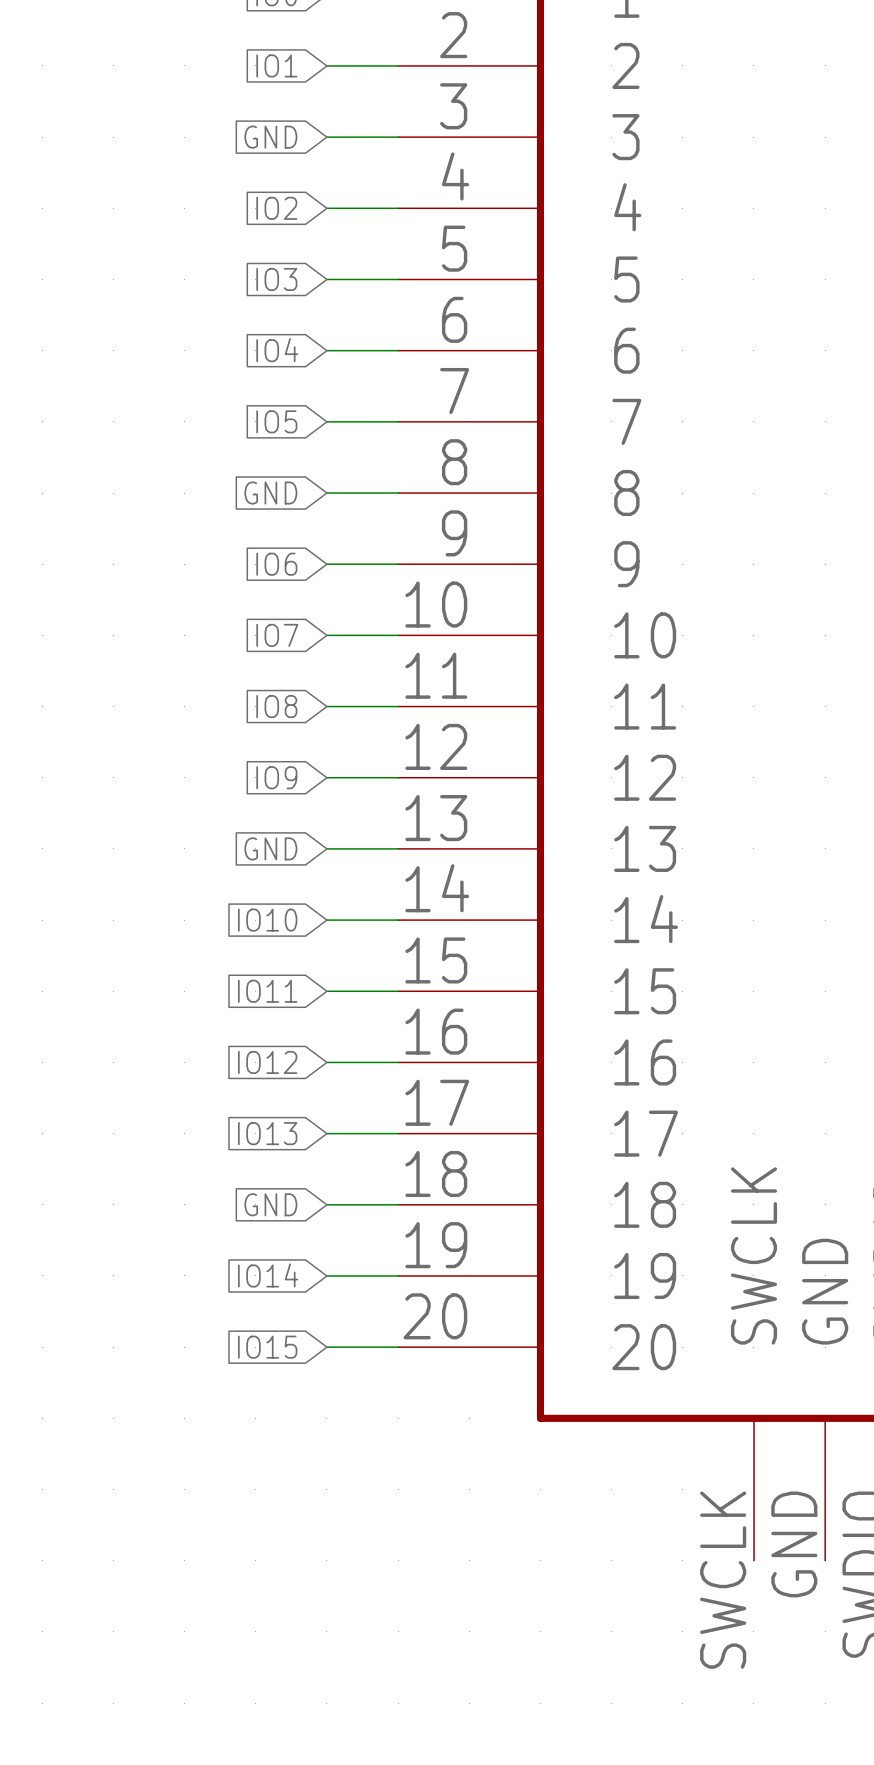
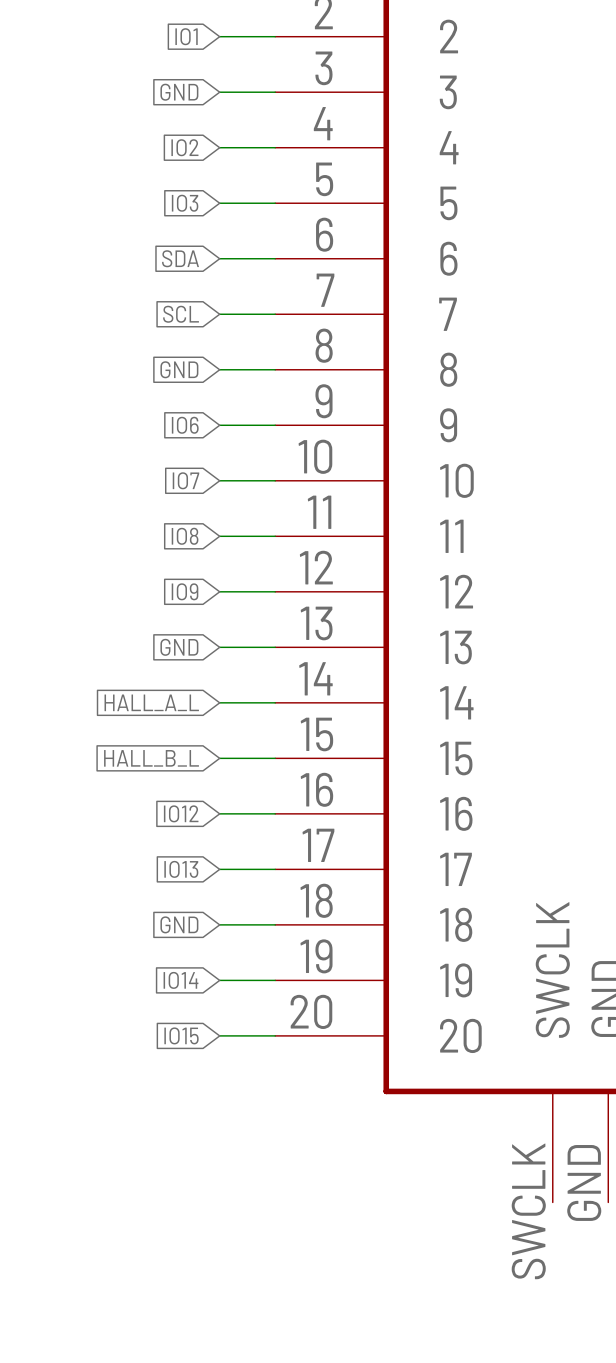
global label: IO4 (277, 350) -> SDA (180, 258)
global label: IO5 (276, 421) -> SCL (181, 314)
global label: IO10 (267, 920) -> HALL_A_L (151, 702)
global label: IO11 (267, 991) -> HALL_B_L (151, 758)

